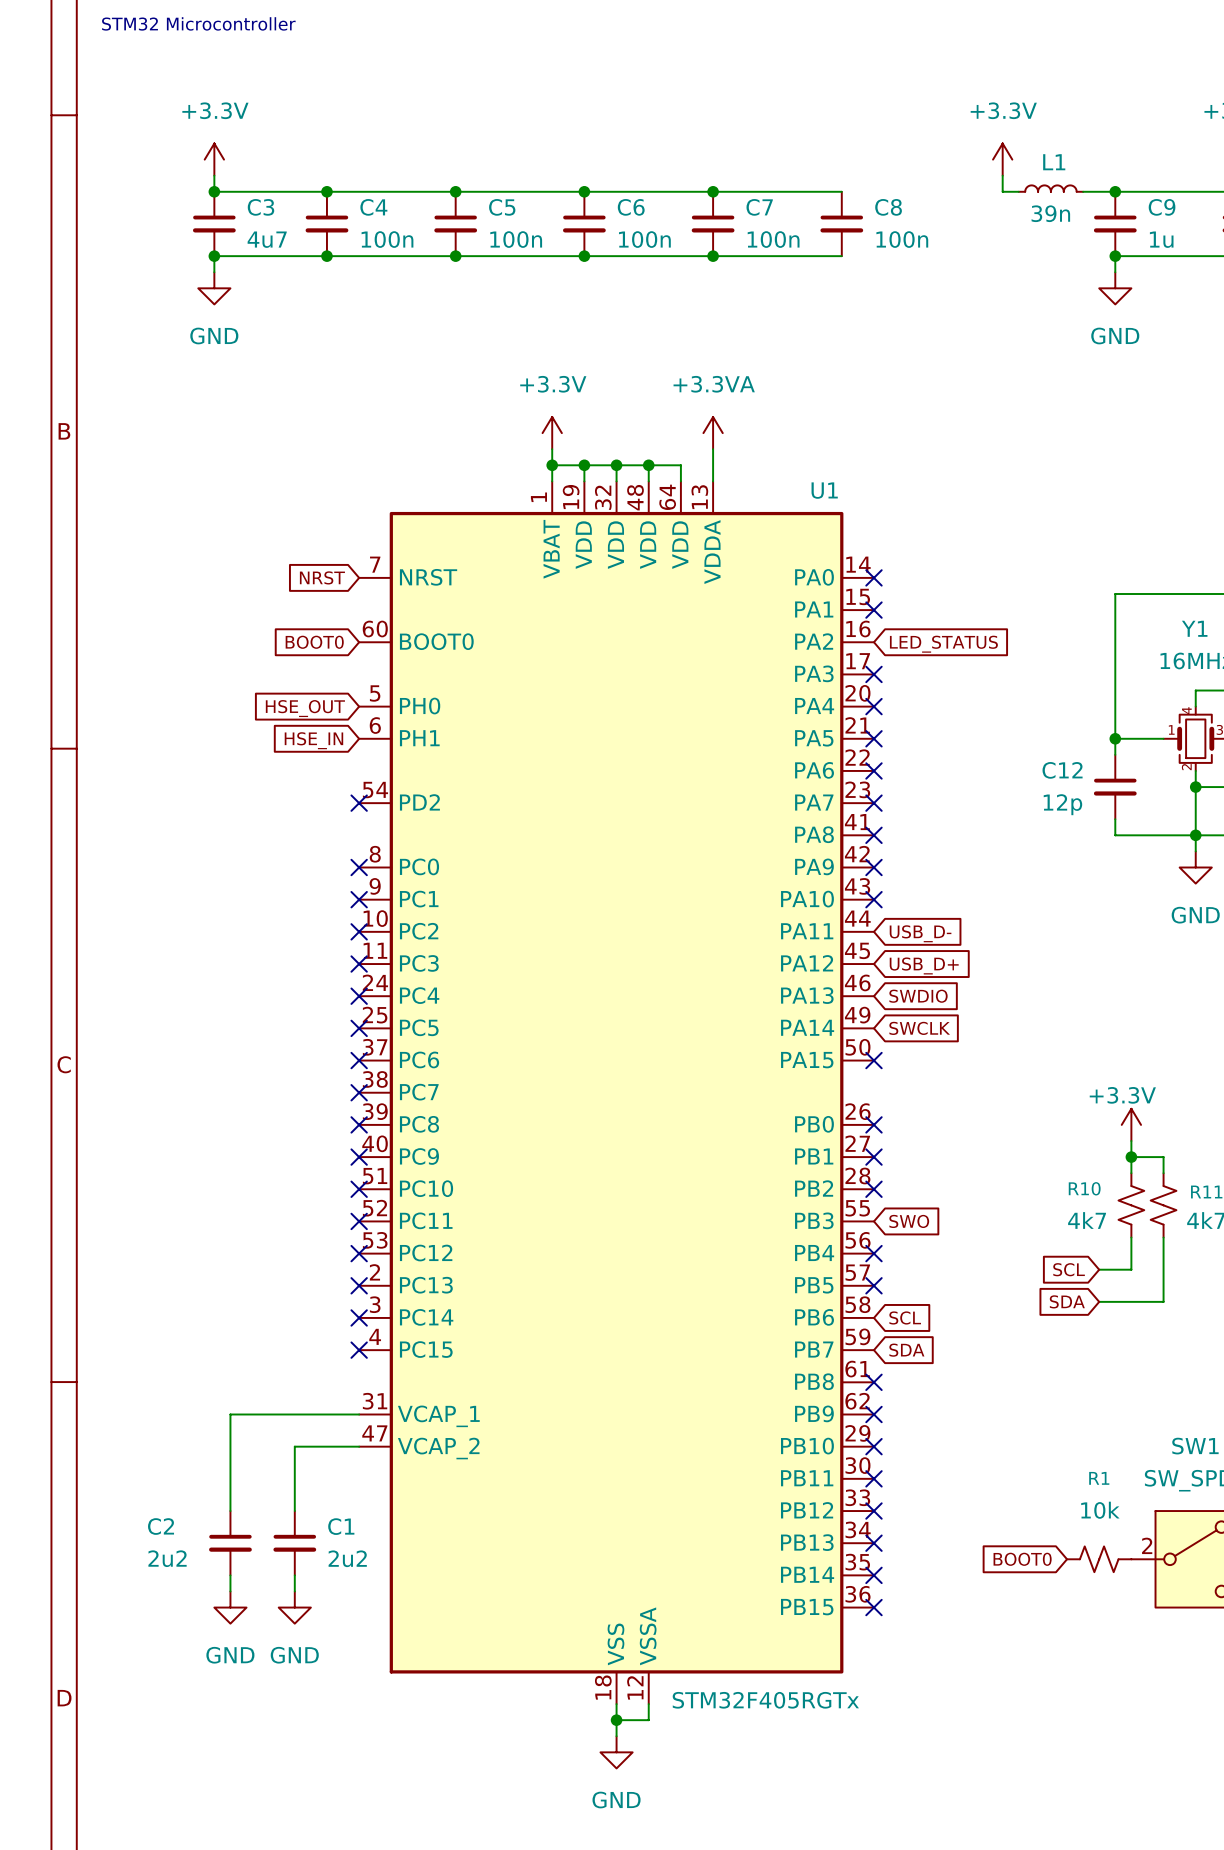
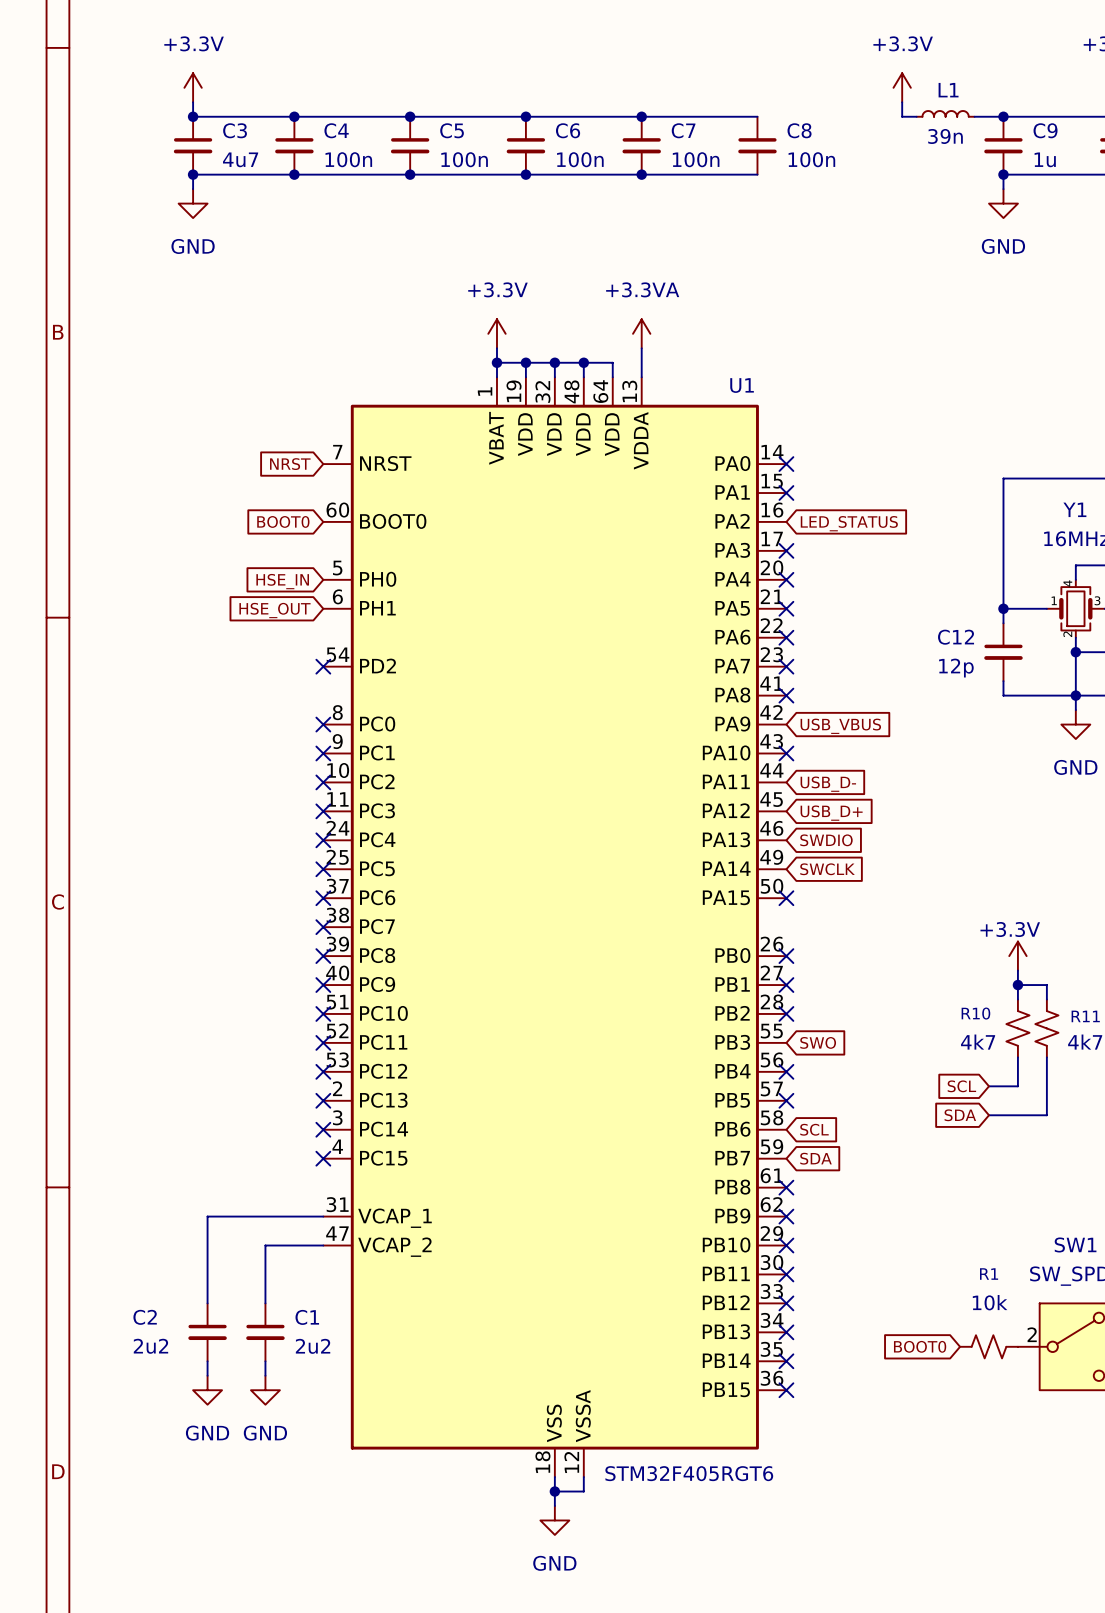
global label: HSE_OUT (305, 708) -> HSE_IN (282, 581)
global label: HSE_IN (313, 740) -> HSE_OUT (274, 610)
no-connect mark: (873, 867) -> none
global label: none -> USB_VBUS (840, 726)
U1 value: STM32F405RGTx (765, 1700) -> STM32F405RGT6 (689, 1473)

